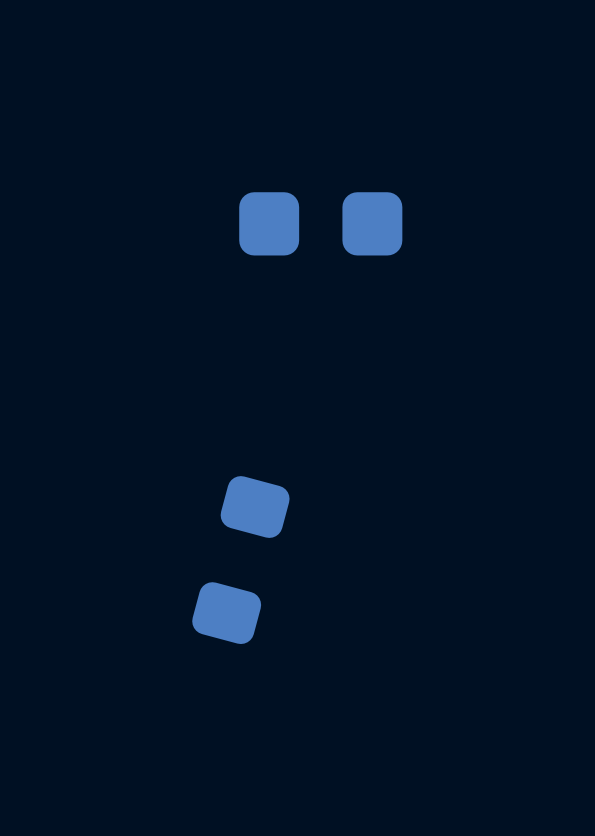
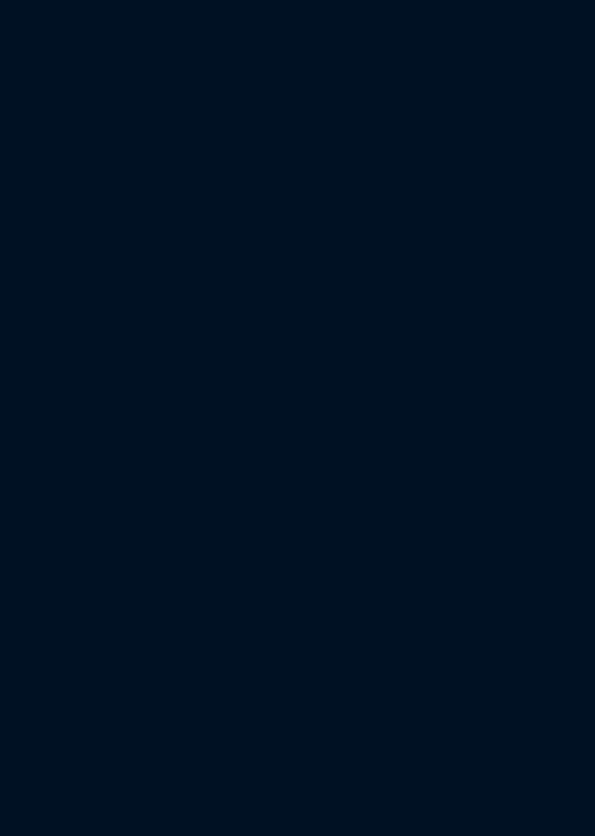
part: (320, 223) -> none
part: (240, 560) -> none

